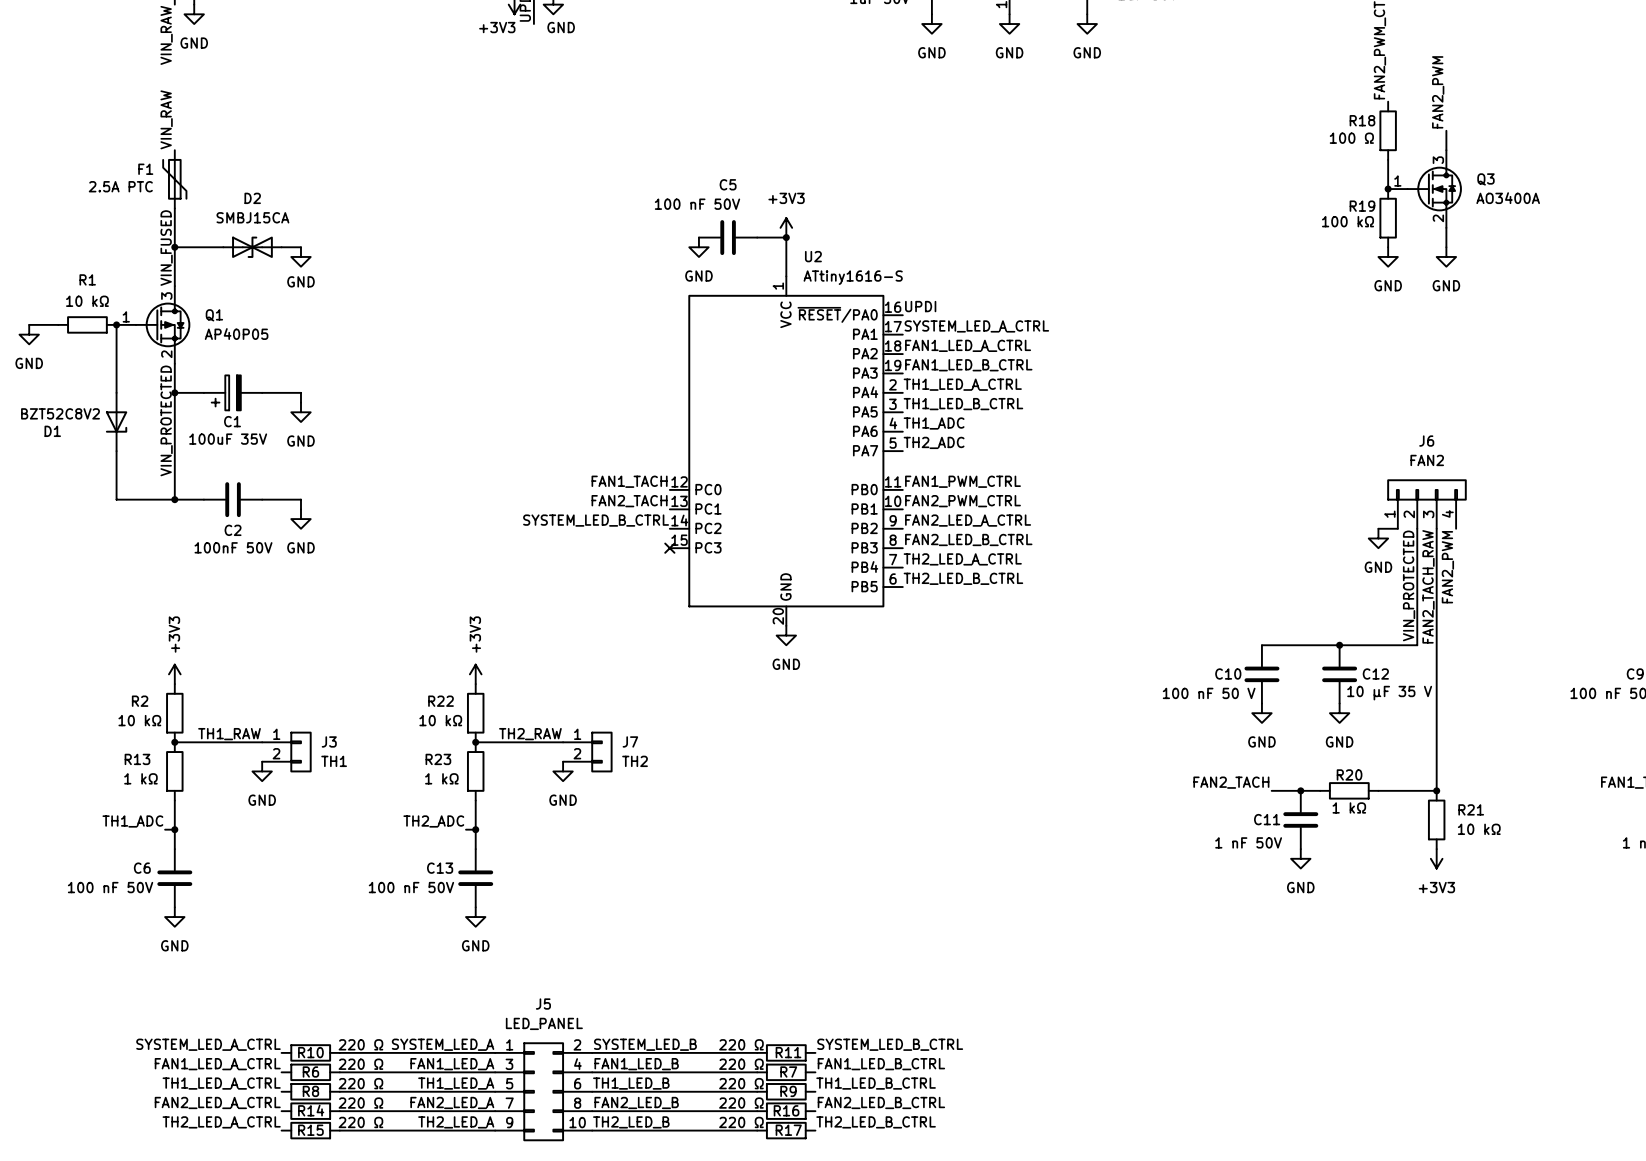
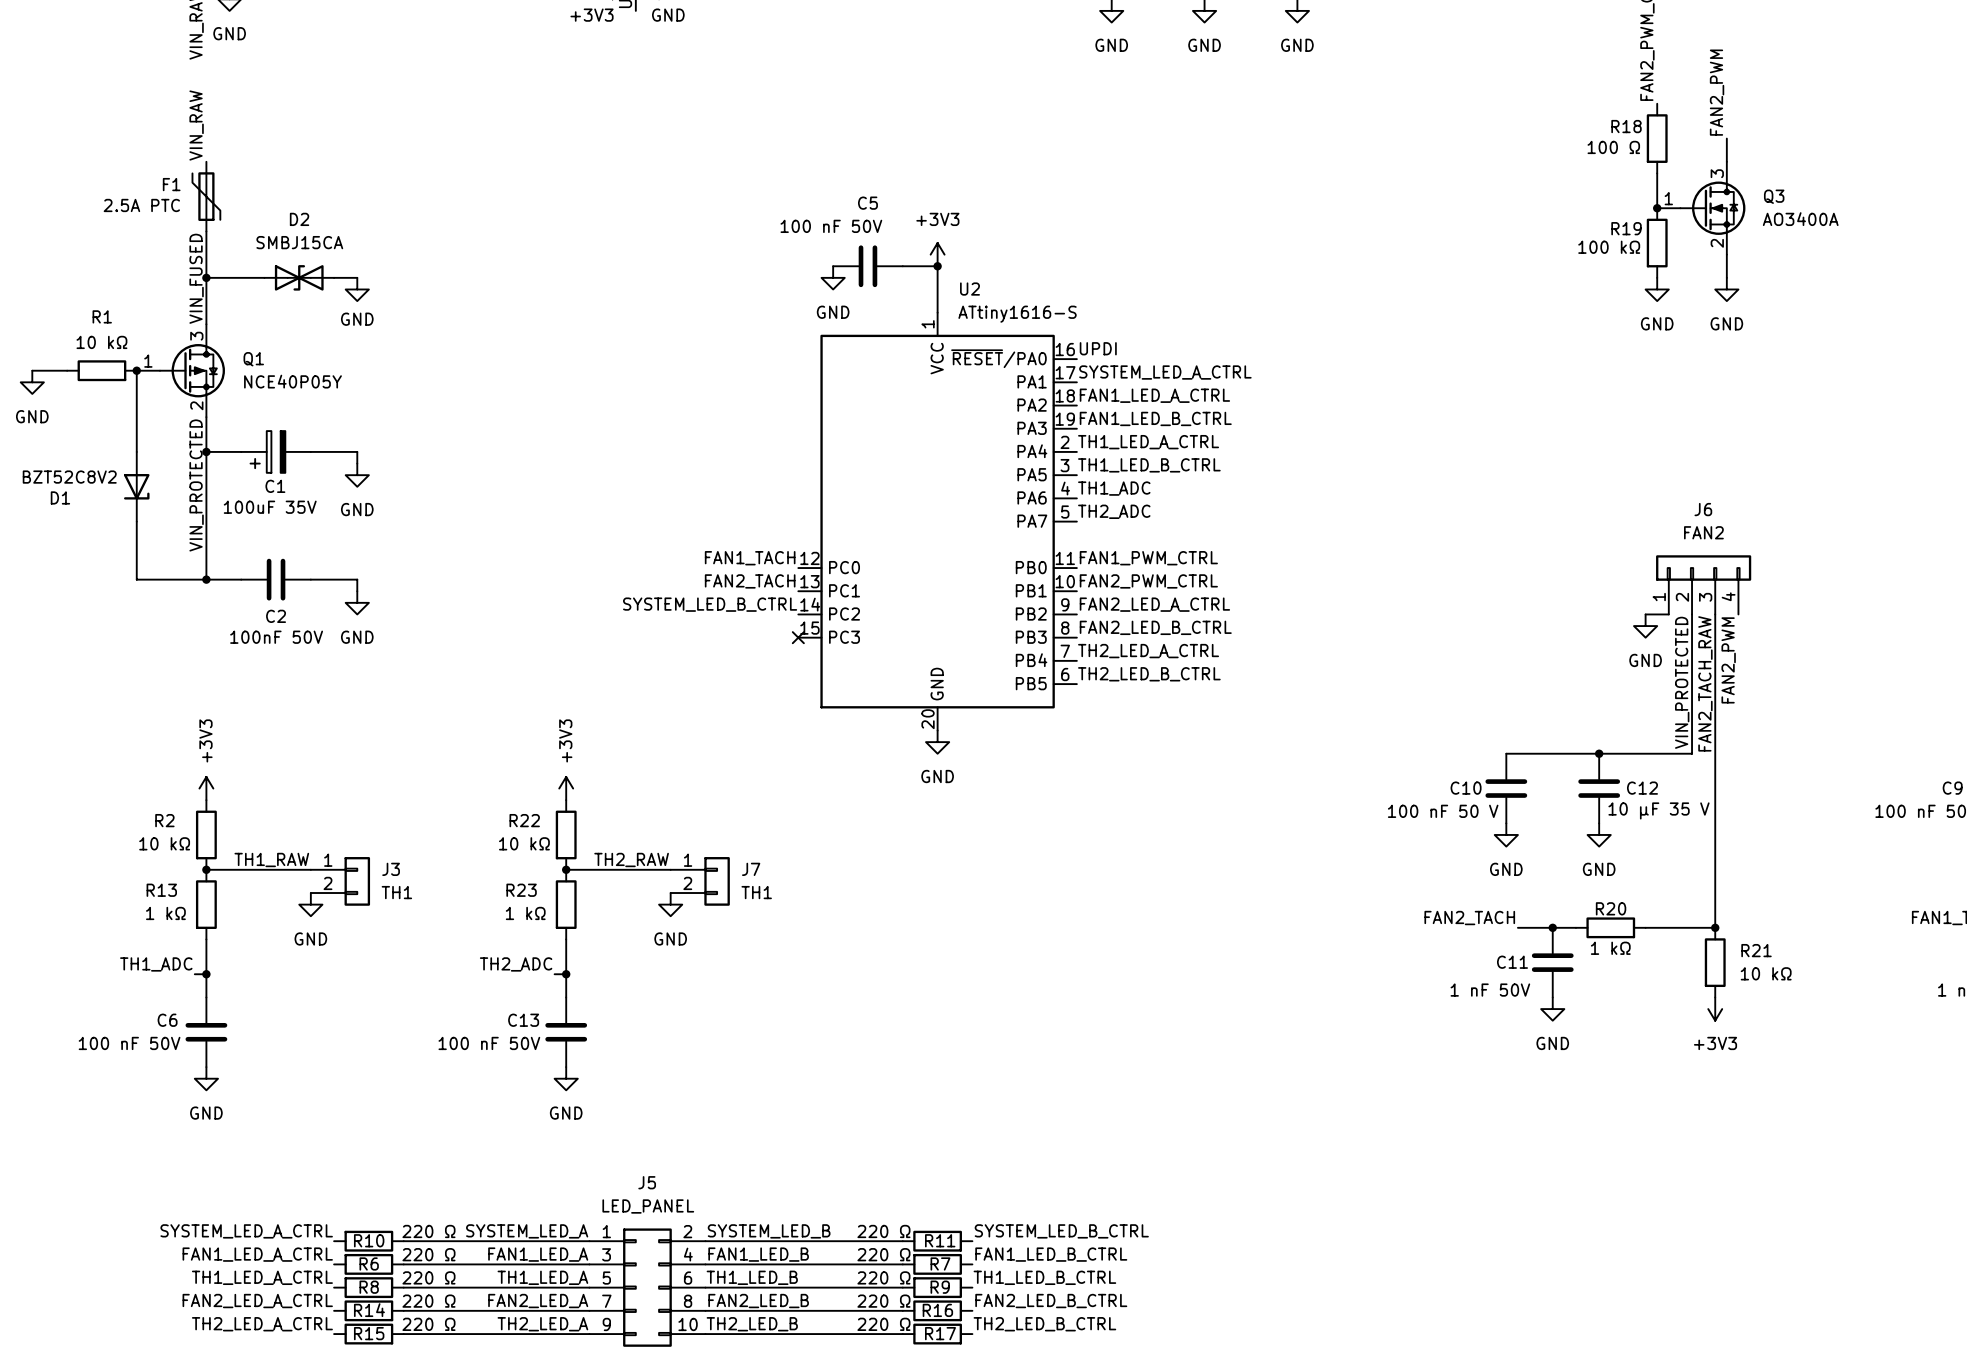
Q1 value: AP40P05 (236, 334) -> NCE40P05Y (292, 381)
J7 value: TH2 (635, 761) -> TH1 (756, 892)

